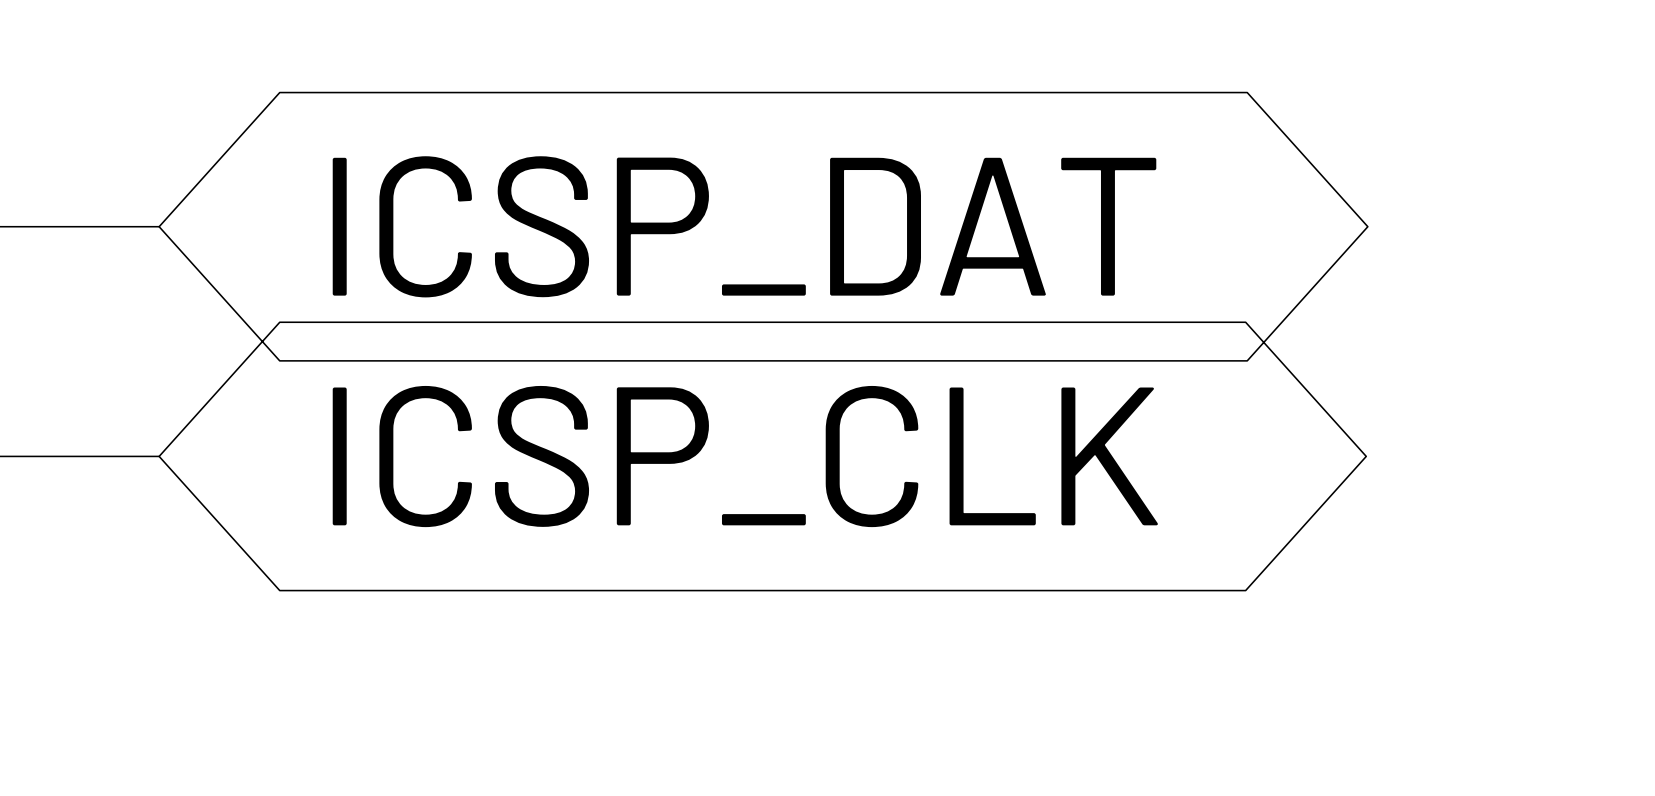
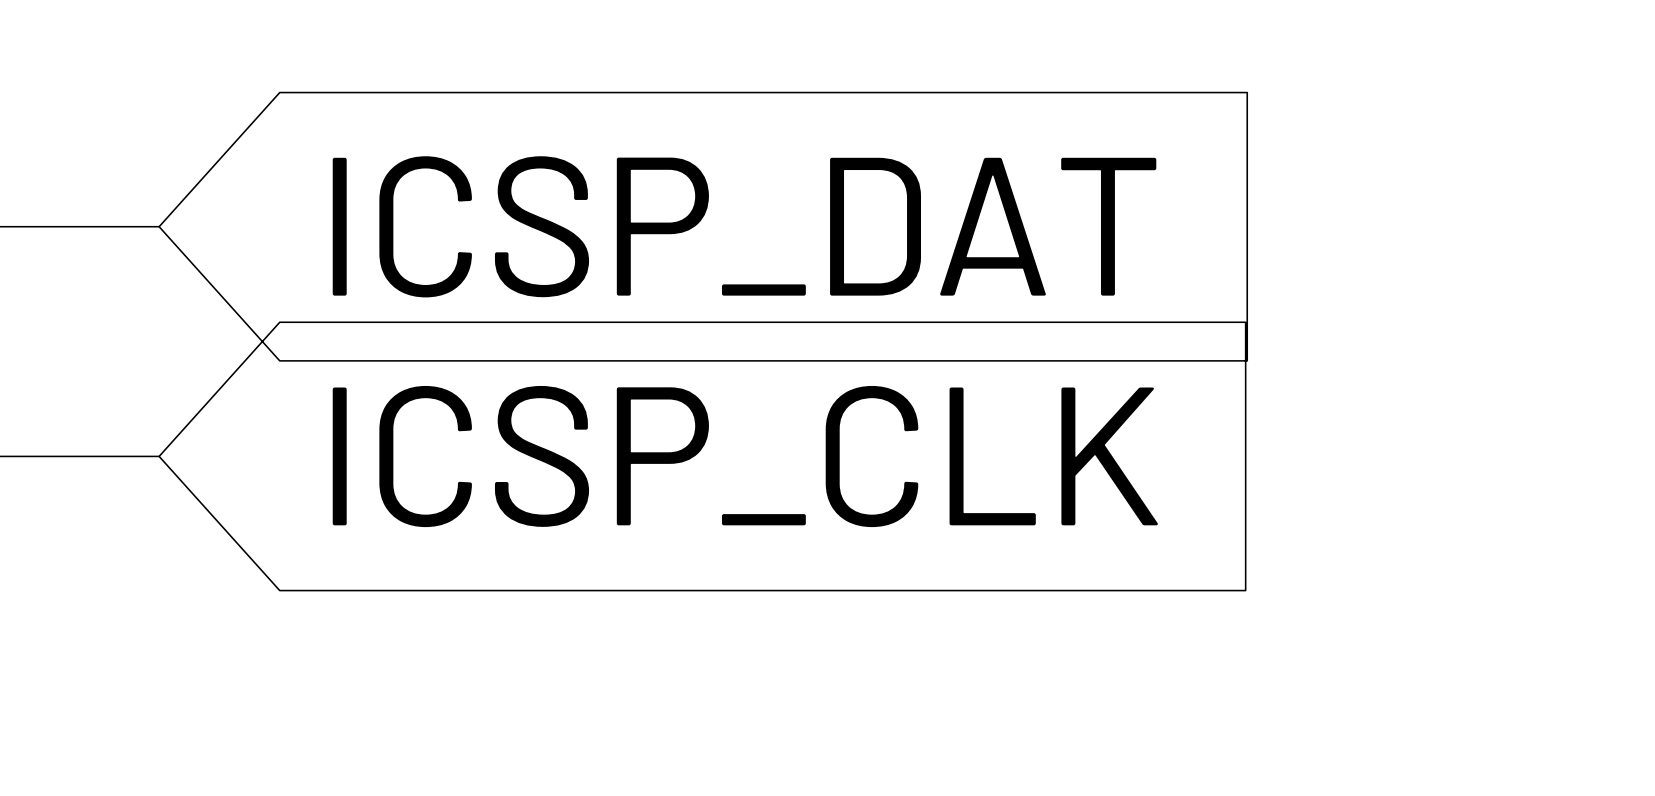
global label shape: bidirectional (744, 226) -> input (744, 226)
global label shape: bidirectional (745, 456) -> input (745, 456)

